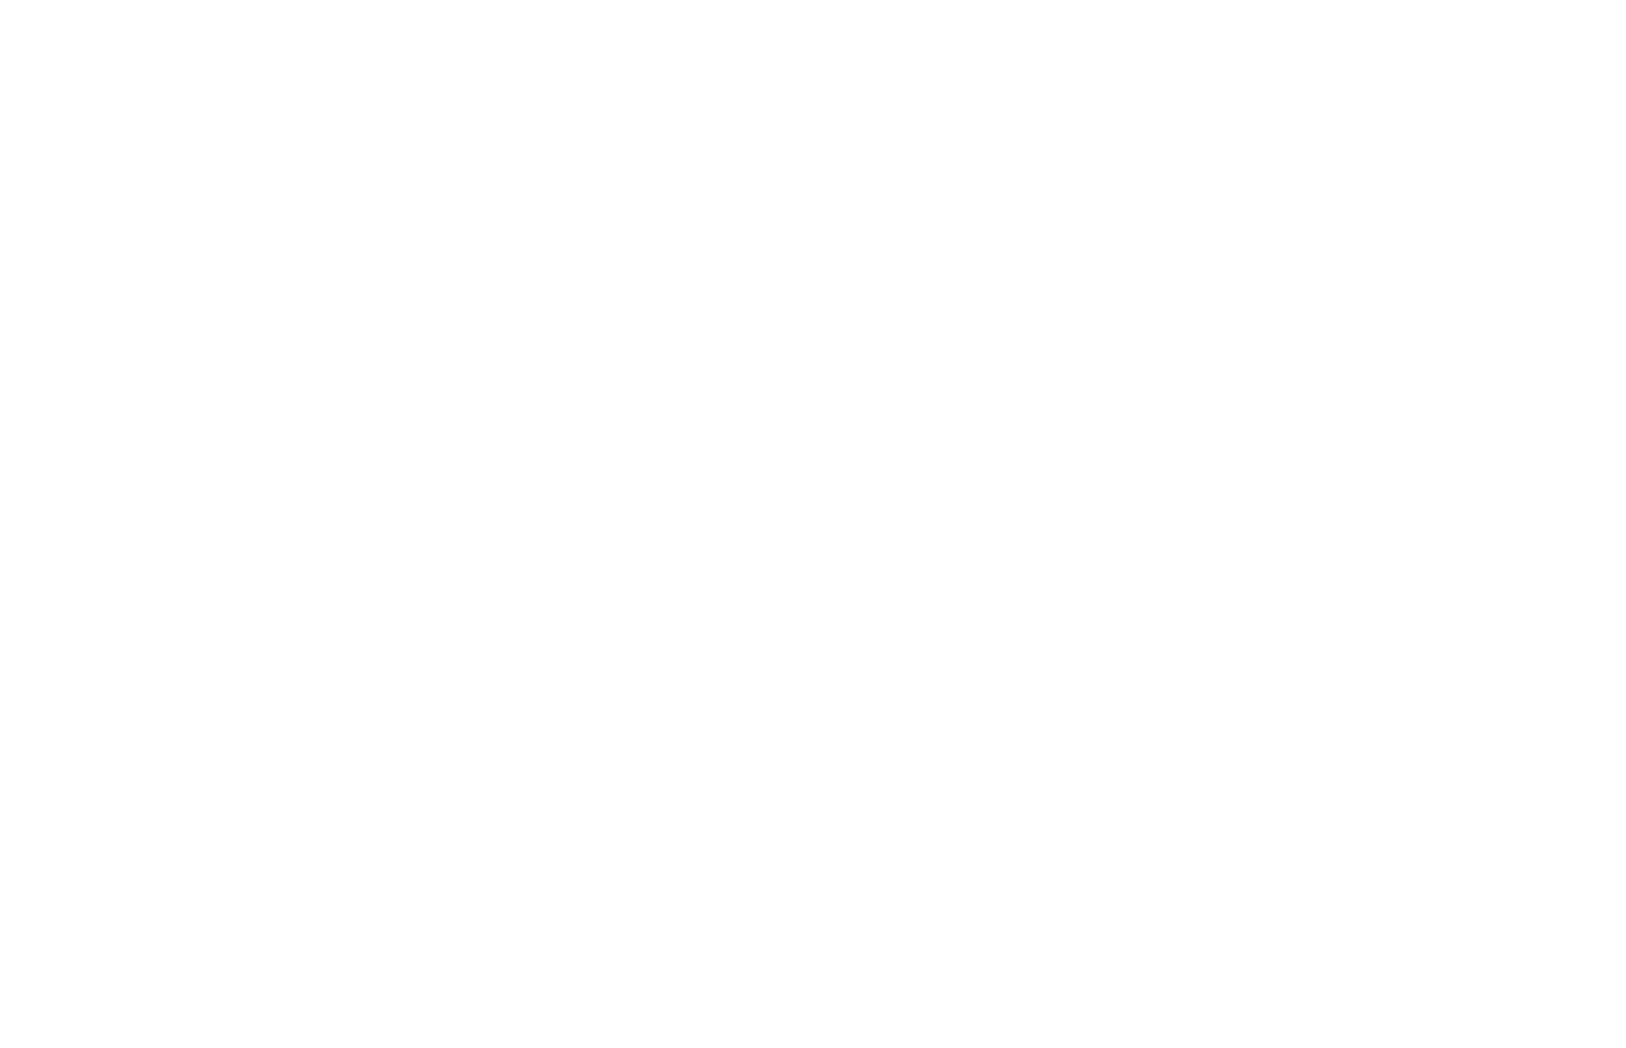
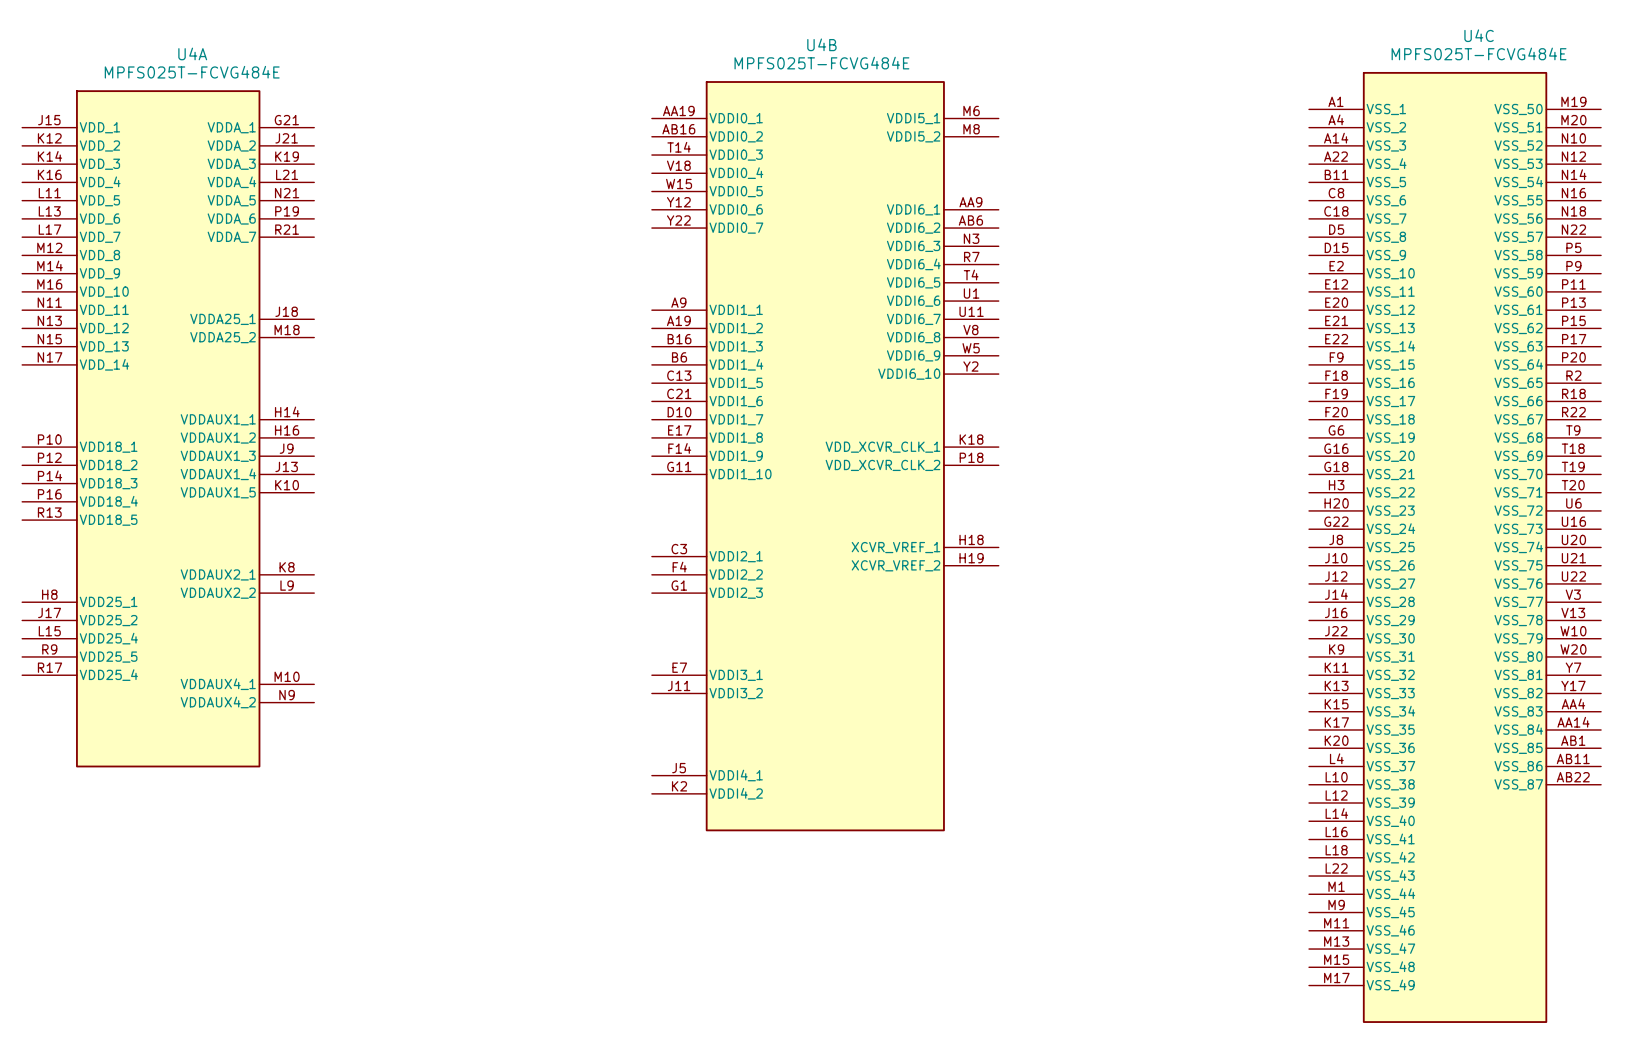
U4A: none -> MPFS025T-FCVG484E (168, 428)
U4B: none -> MPFS025T-FCVG484E (825, 456)
U4C: none -> MPFS025T-FCVG484E (1455, 547)

